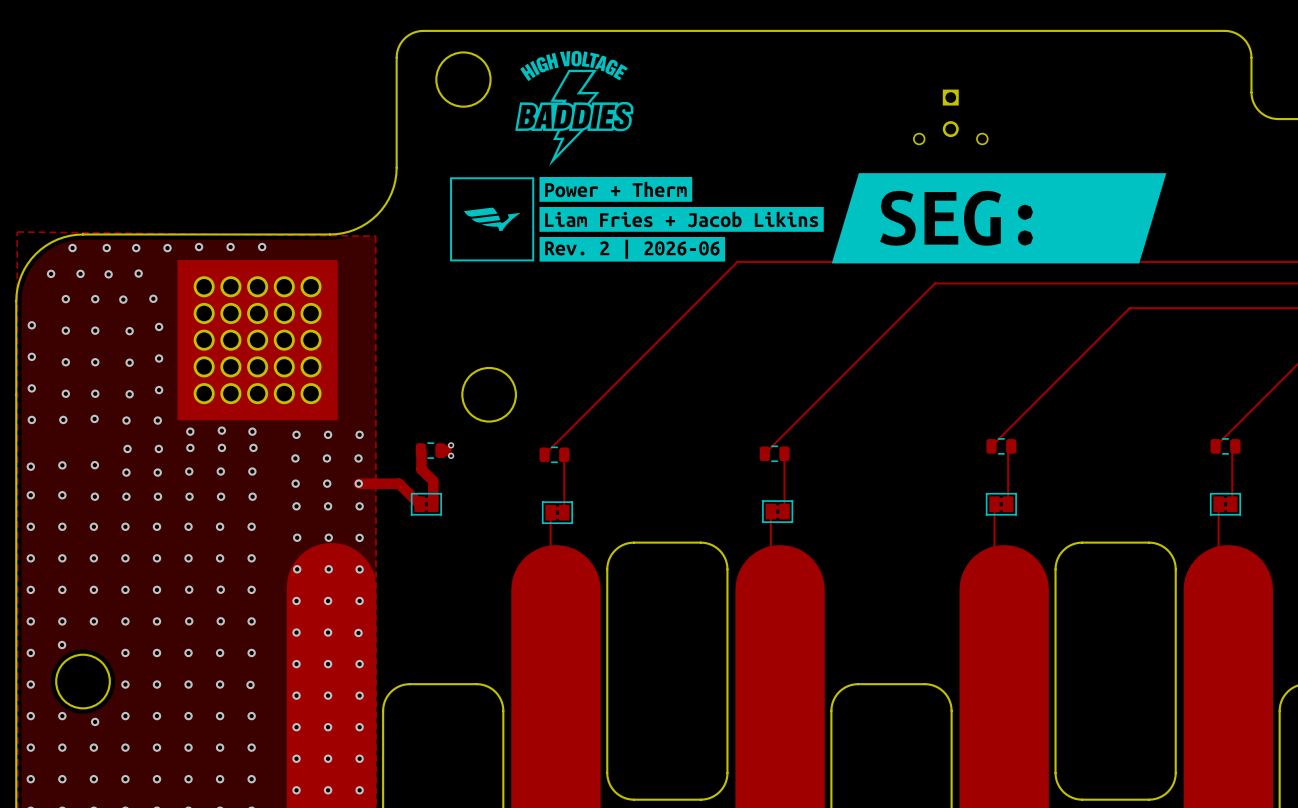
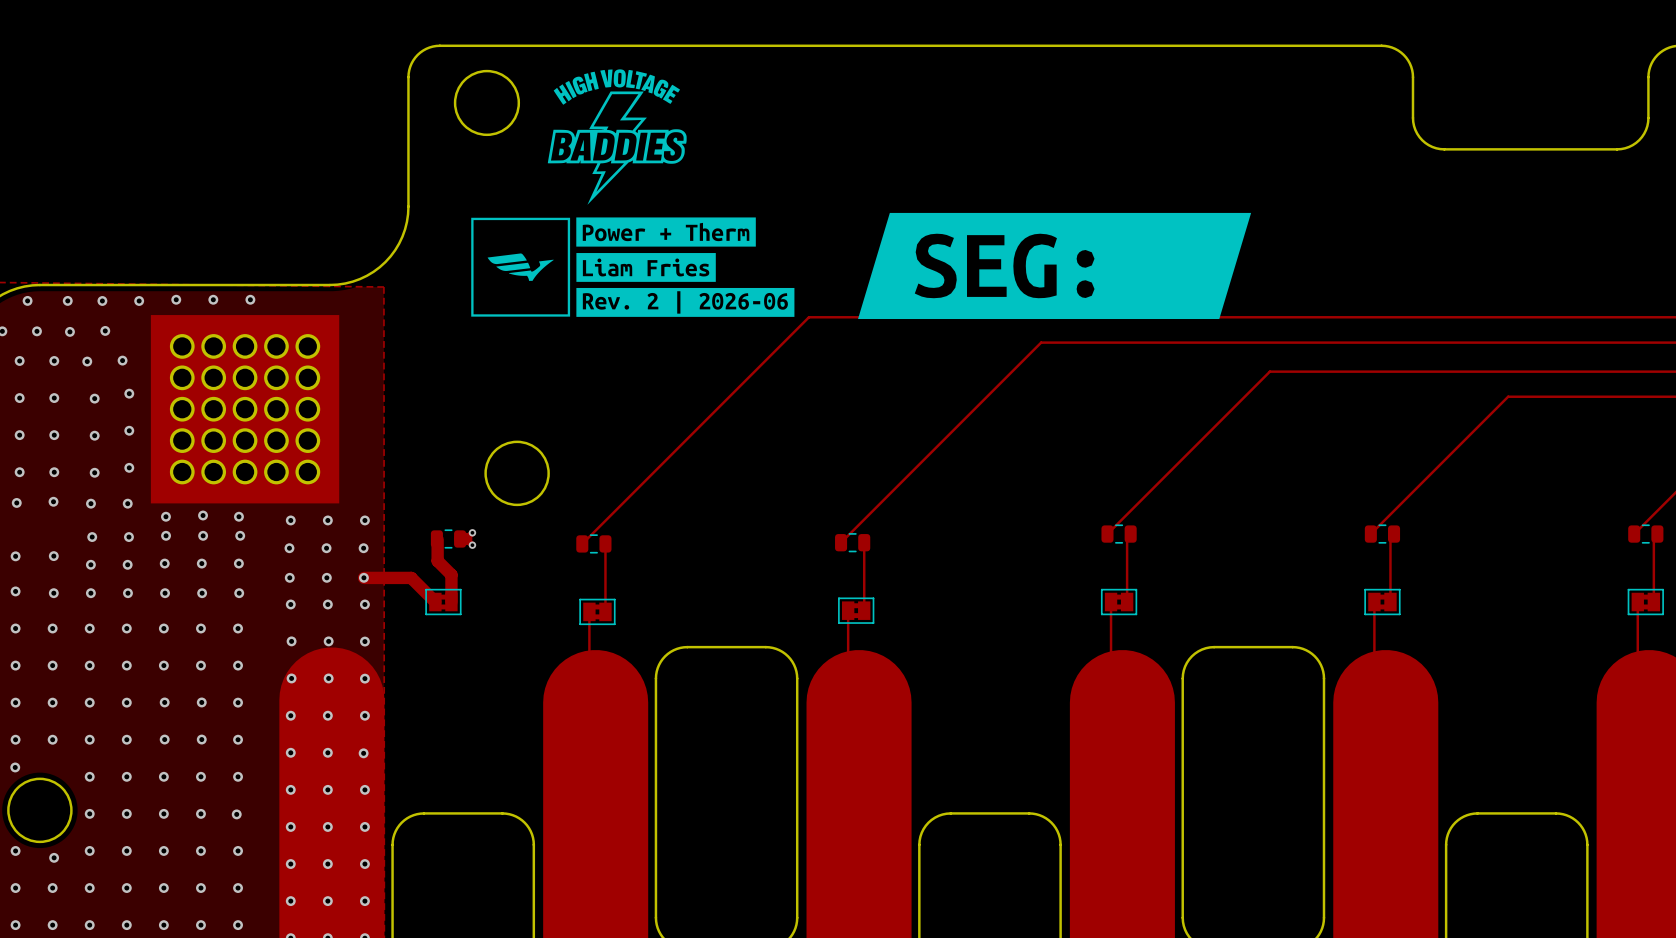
part: (950, 116) -> none
drawing: [539, 206, 824, 232] -> none
drawing: none -> [576, 253, 716, 282]
drawing position: (999, 218) -> (1054, 265)

